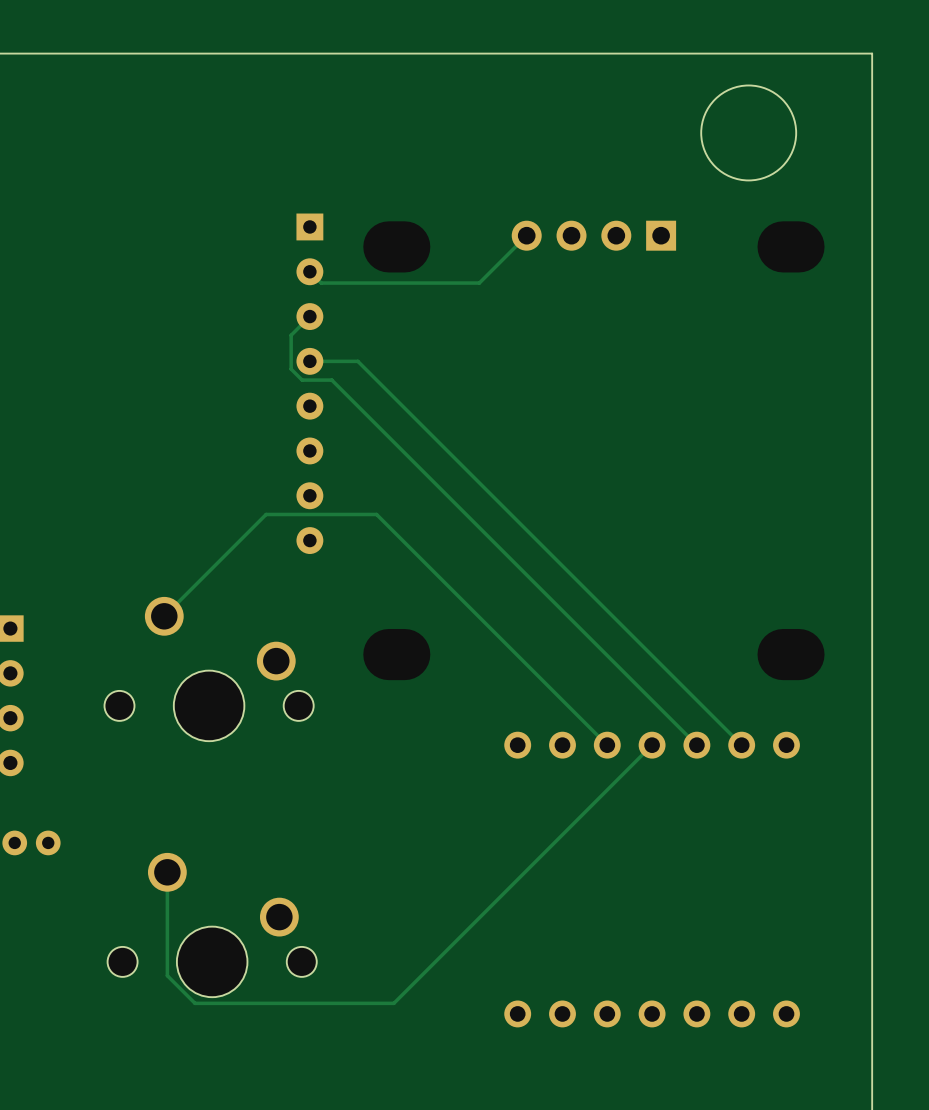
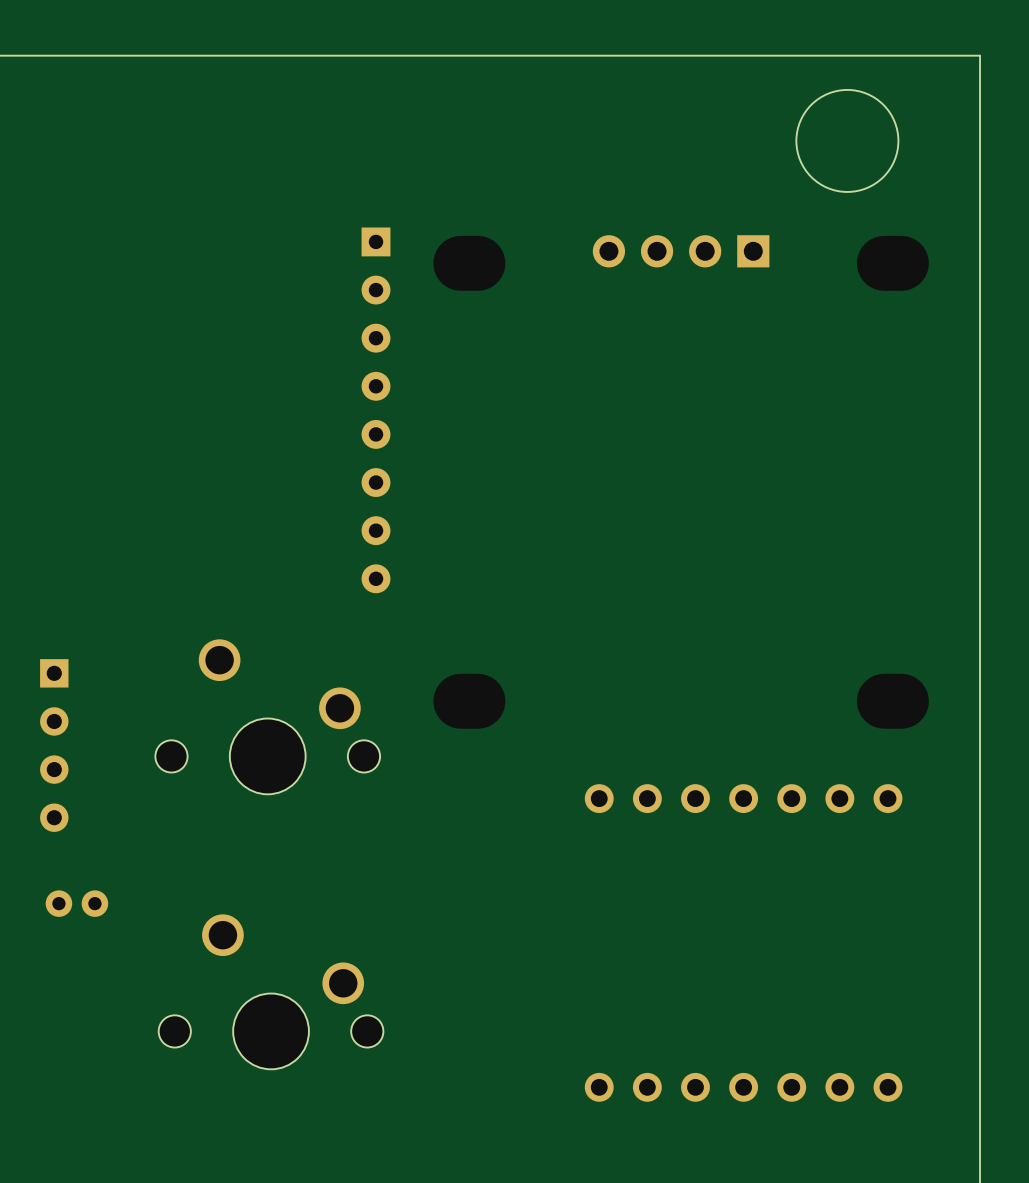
track: (526, 235) (479, 283) (321, 283) (309, 271) -> none
track: (309, 316) (291, 335) (291, 369) (302, 380) (331, 380) (696, 745) -> none
track: (309, 361) (357, 361) (741, 745) -> none
track: (164, 616) (266, 514) (376, 514) (607, 745) -> none
track: (652, 745) (393, 1003) (195, 1003) (167, 975) (167, 872) -> none

